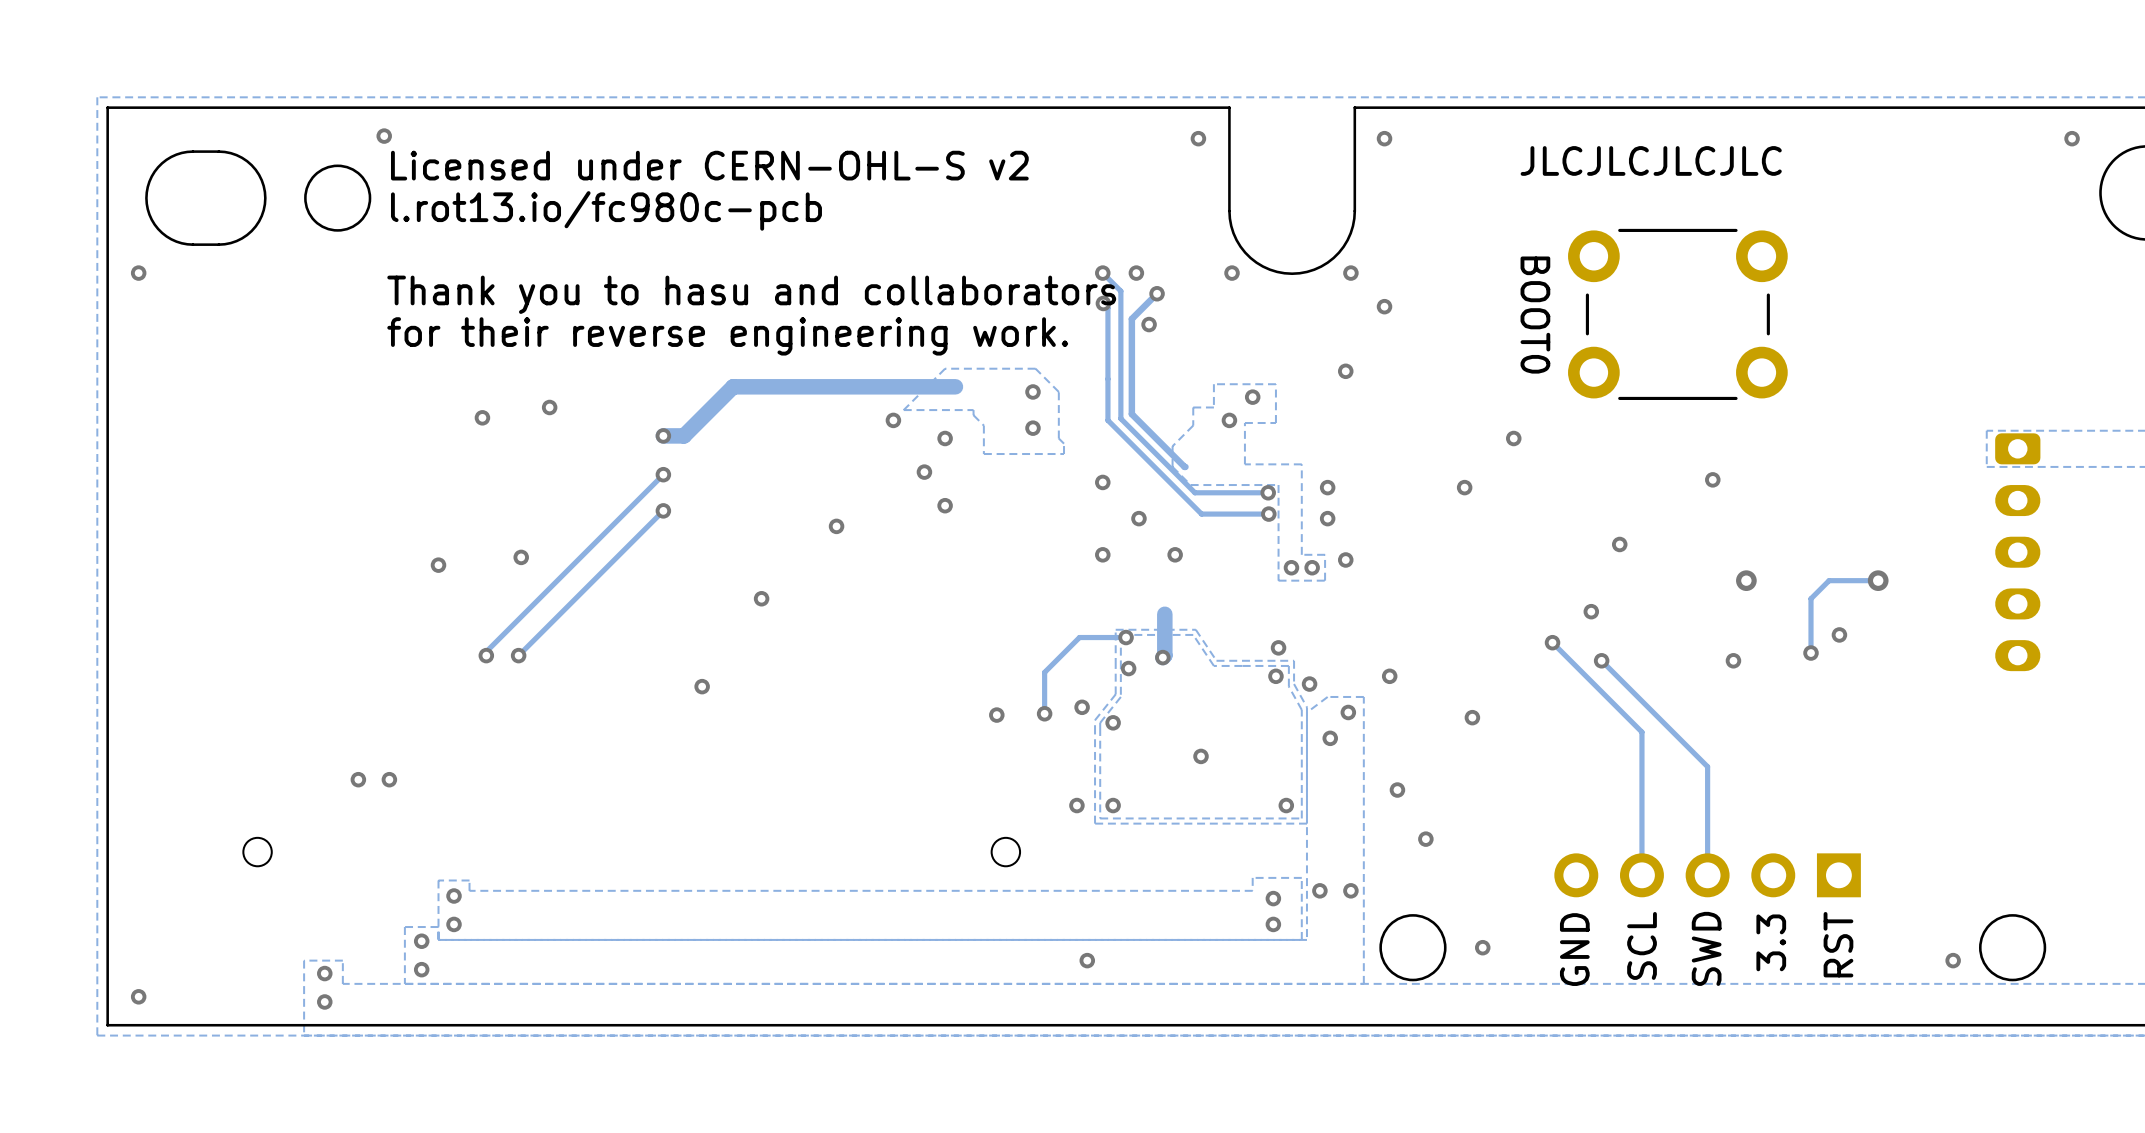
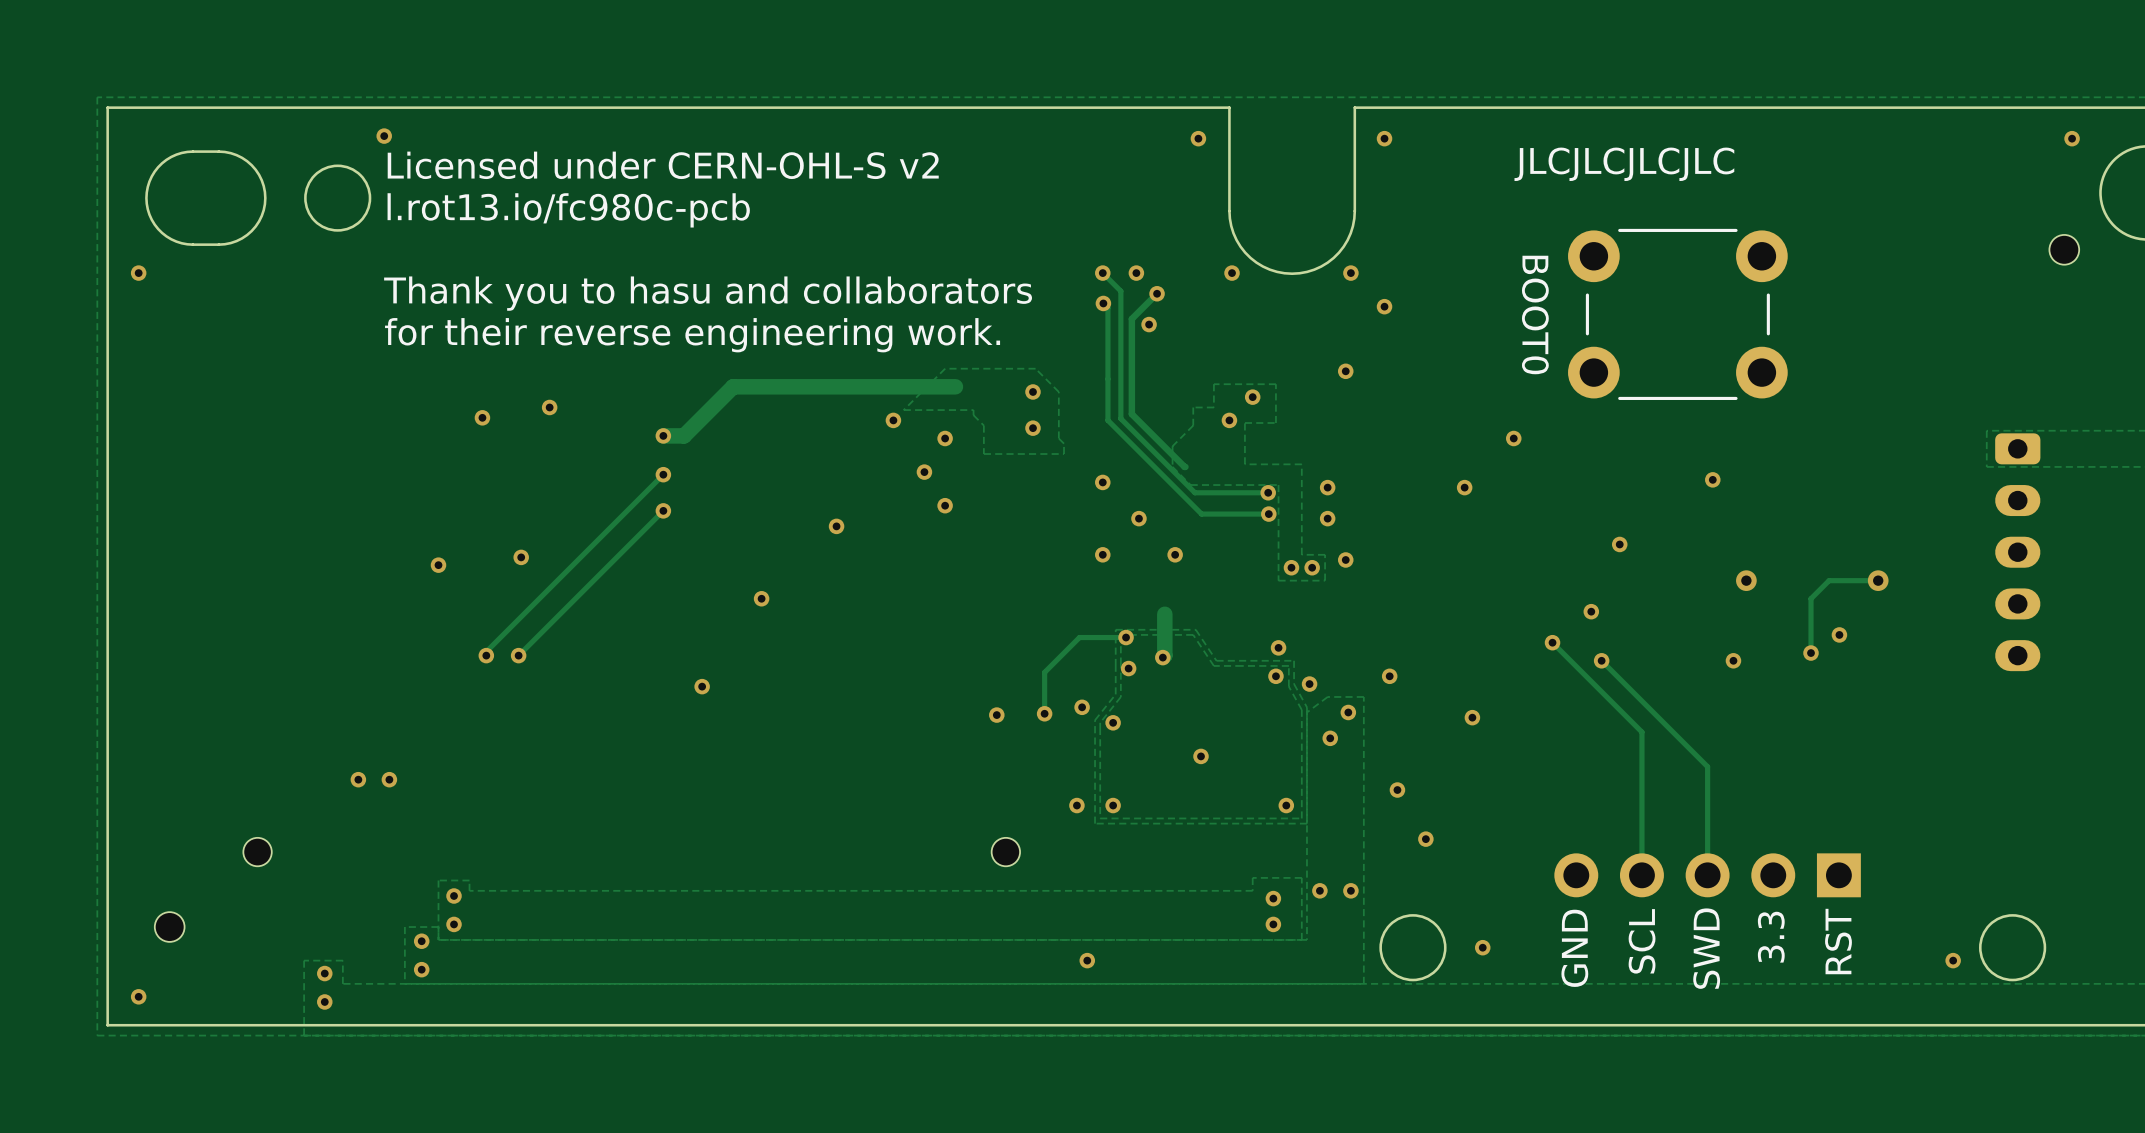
part: none -> (2064, 249)
part: none -> (169, 927)

